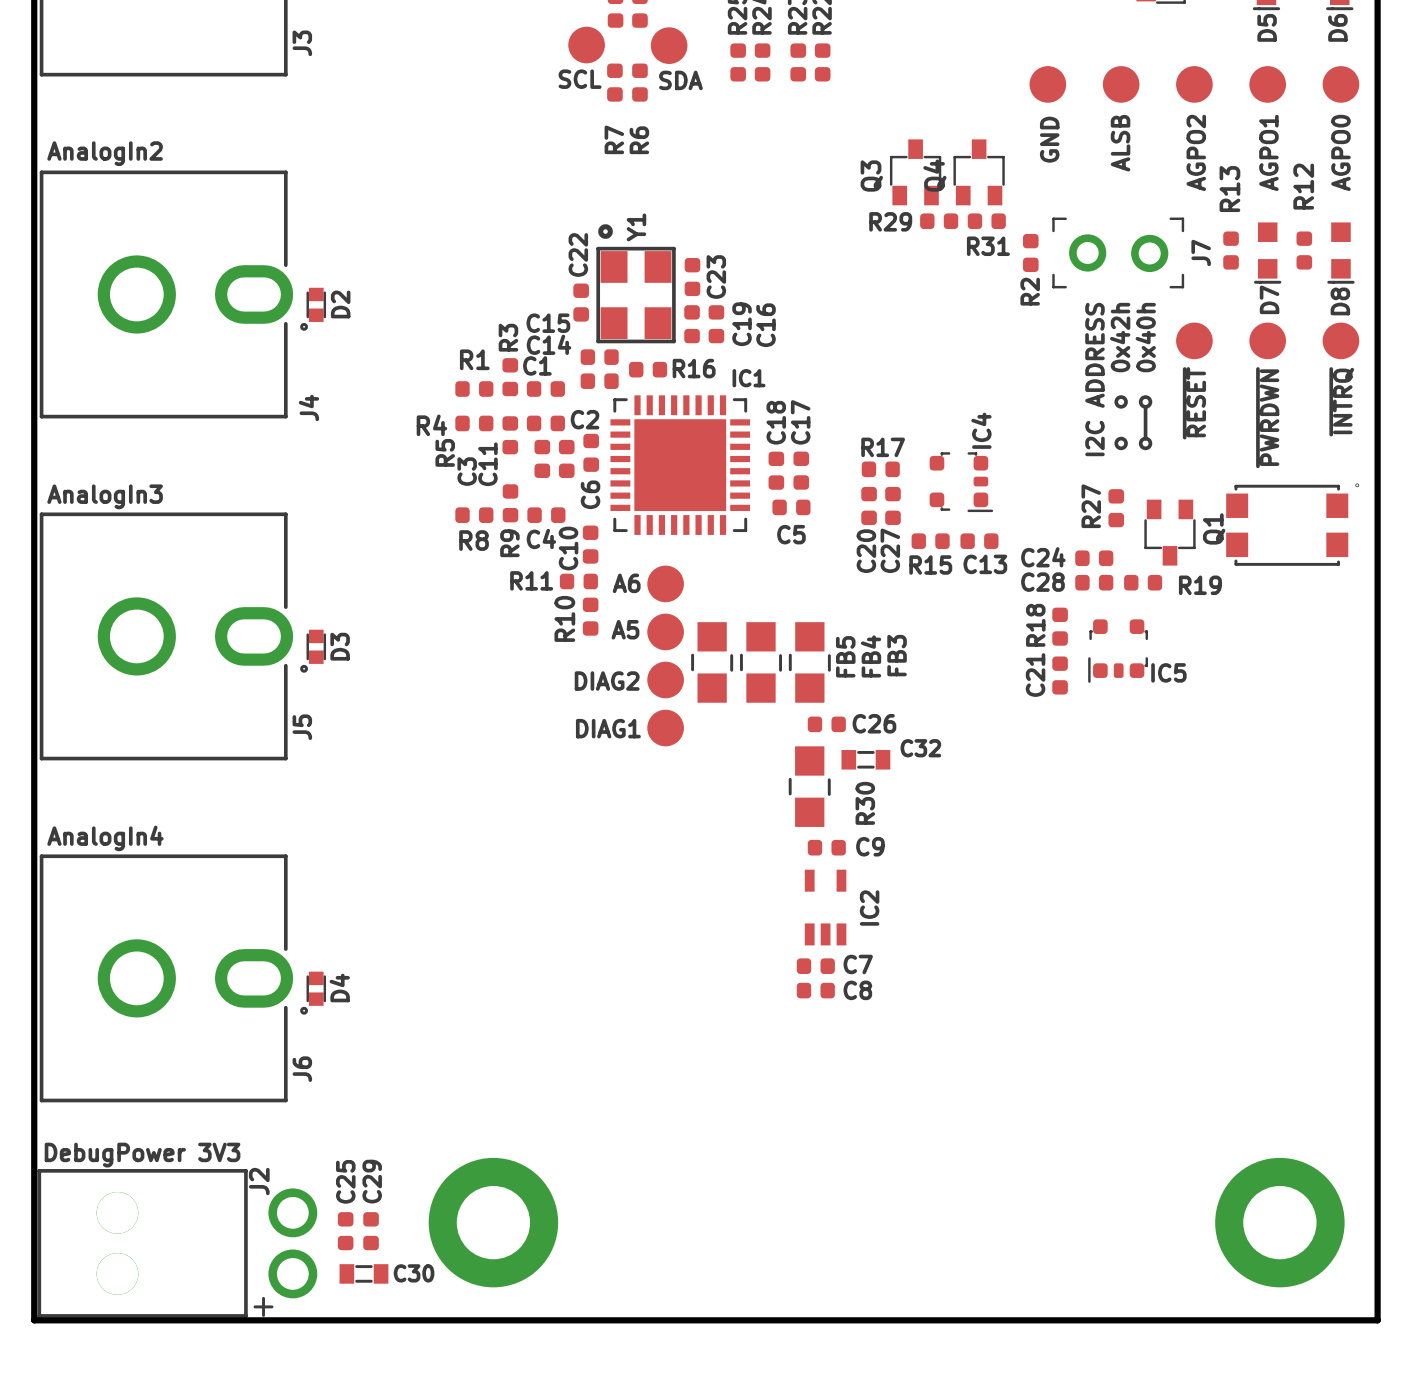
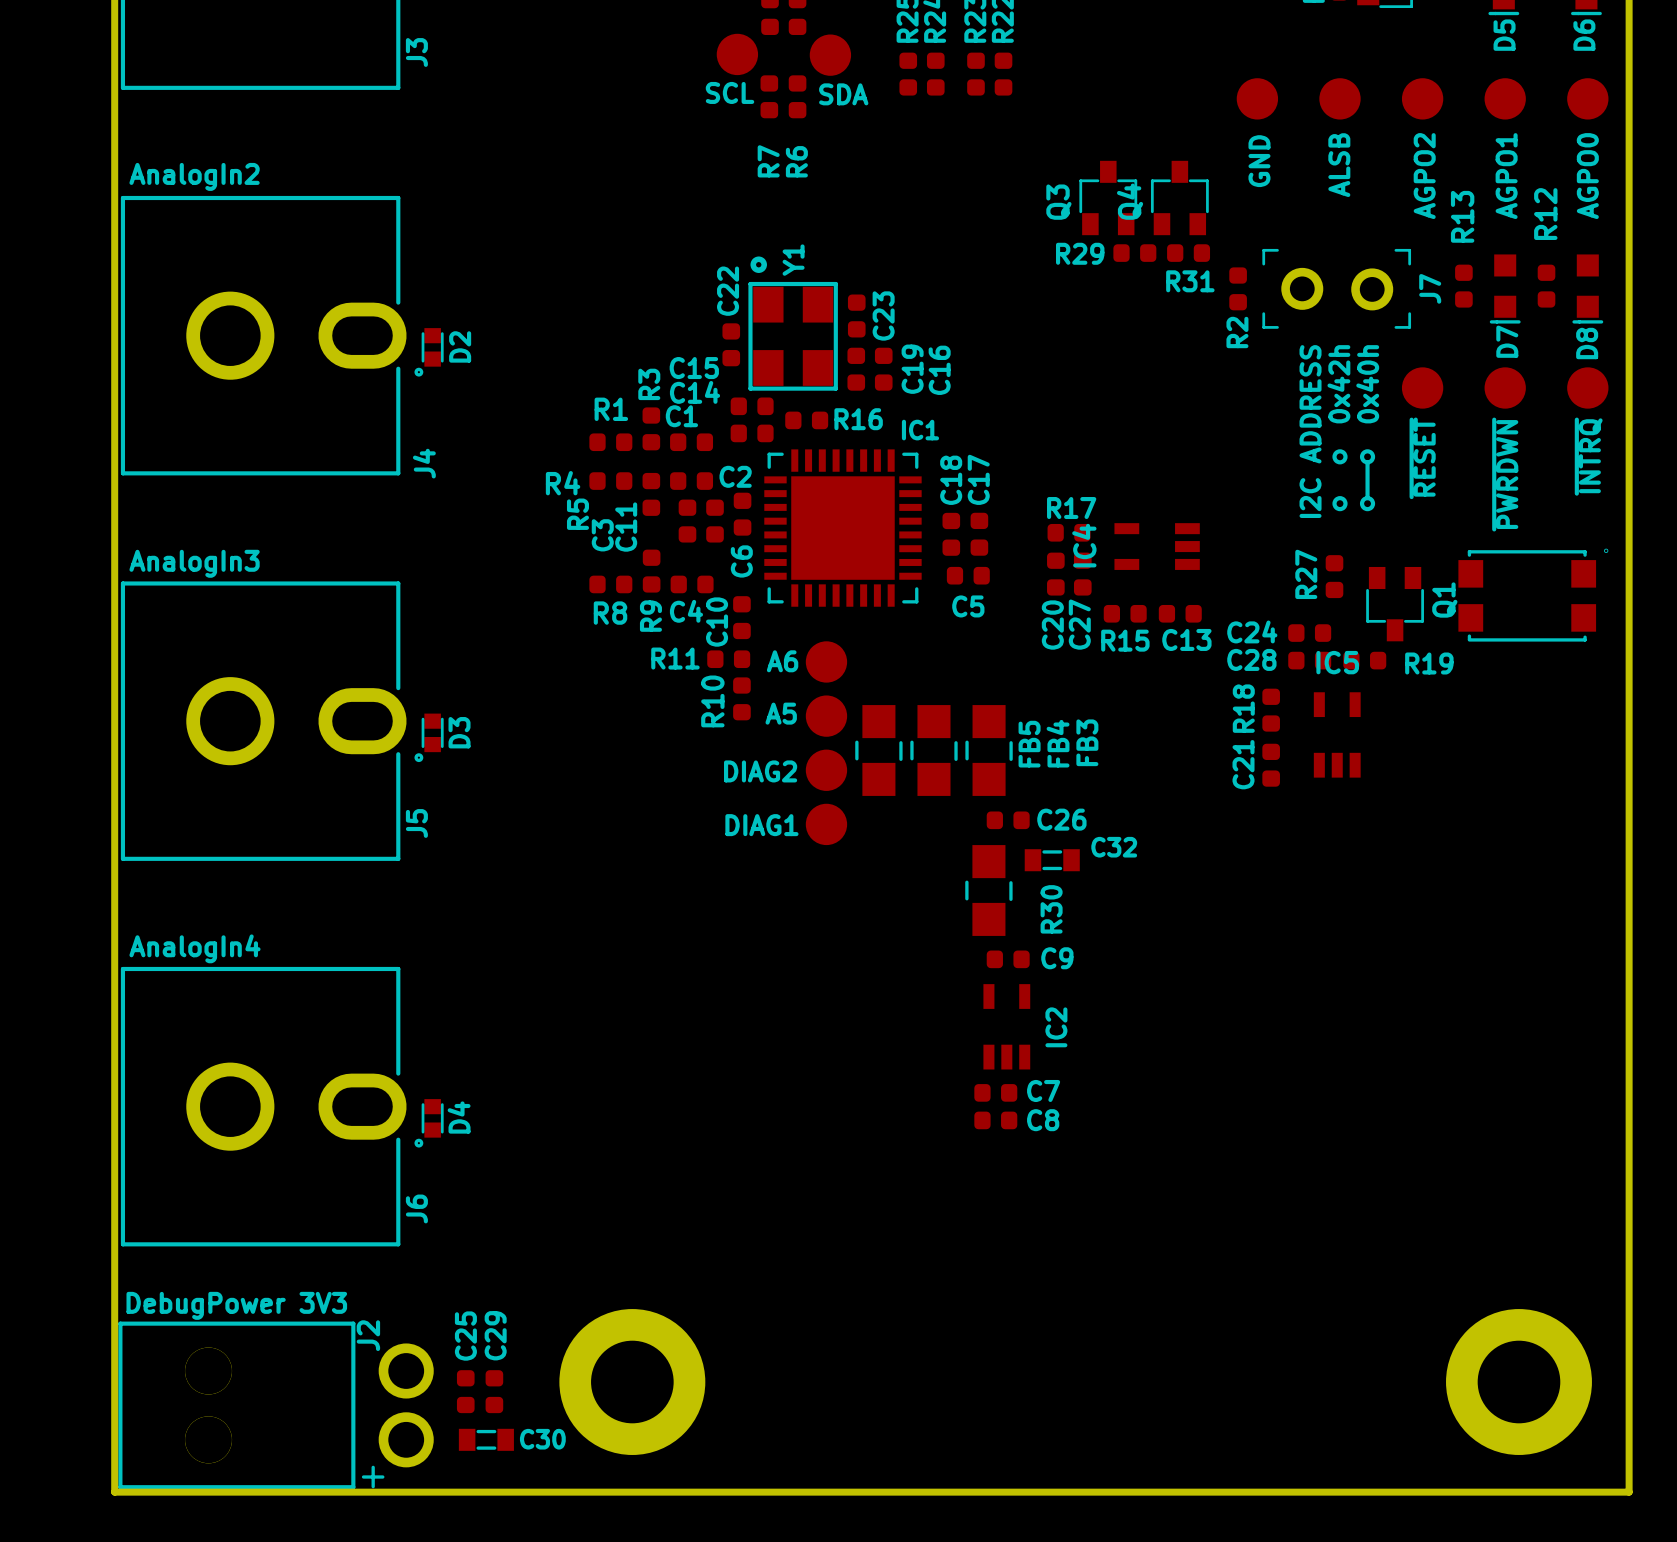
IC4 name position: IC4 (981, 430) -> IC4 (1084, 545)
IC4 footprint: [929, 452, 994, 513] -> [1114, 523, 1200, 570]
IC5 footprint: [1088, 619, 1149, 683] -> [1313, 692, 1361, 778]
IC5 name position: IC5 (1168, 672) -> IC5 (1337, 662)

